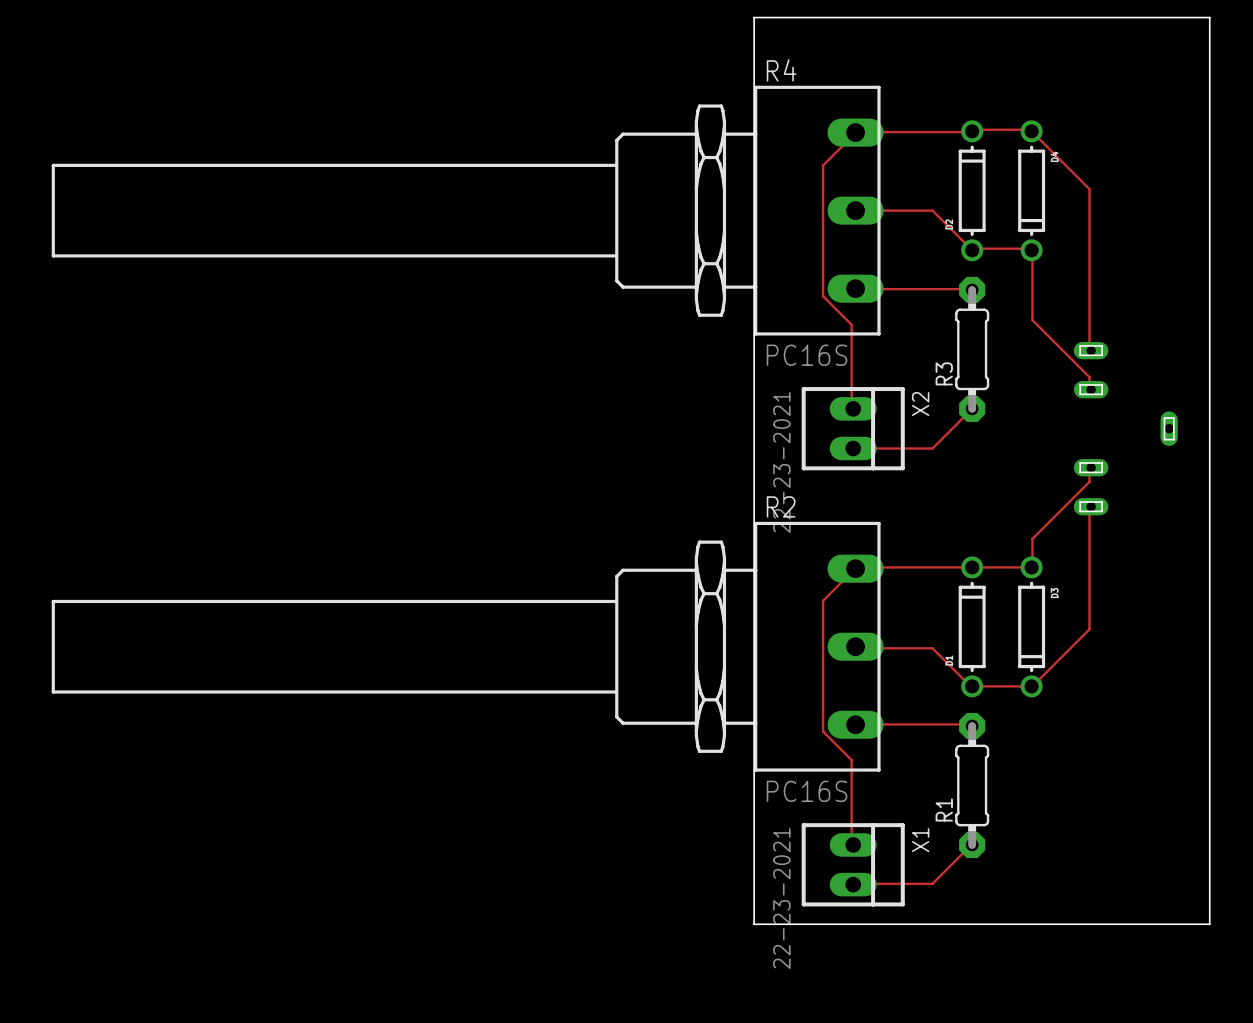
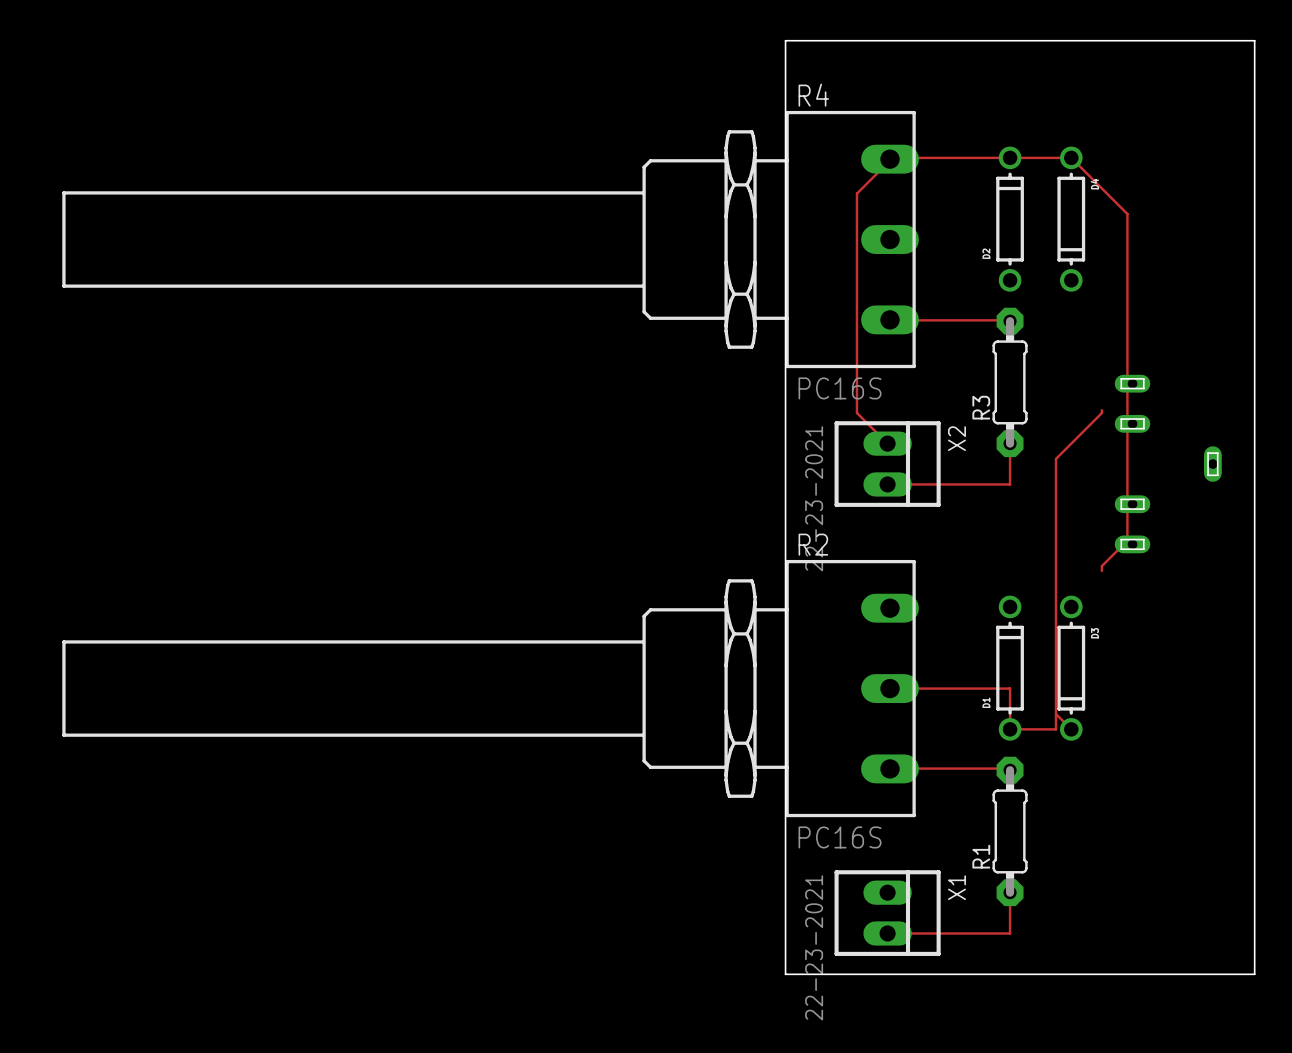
track: (1031, 131) (1030, 129) (972, 129) (970, 132) (856, 132) (823, 165) (823, 296) (851, 324) (851, 408) (853, 408) -> (1071, 157) (892, 157) (856, 193) (856, 413) (887, 443)
track: (1086, 185) (1089, 189) (1089, 348) (1091, 350) -> (1127, 214) (1127, 540) (1101, 566) (1101, 570)
track: (855, 210) (932, 210) (972, 250) (972, 248) (1030, 248) (1032, 251) (1032, 320) (1089, 377) (1091, 389) -> none
track: (972, 408) (932, 448) -> (1010, 443) (1010, 484) (969, 484)
track: (1091, 467) (1089, 481) (1032, 538) (1032, 567) (856, 567) (823, 600) (823, 731) (851, 760) (851, 843) (853, 844) -> none
track: (1091, 506) (1089, 507) (1089, 629) (1032, 686) (1016, 686) -> (1101, 410) (1101, 413) (1055, 458) (1055, 729)
track: (855, 646) (856, 648) (932, 648) (972, 686) -> (890, 688) (1010, 688) (1010, 729)
track: none -> (1055, 714) (1071, 729)
track: (972, 844) (932, 883) (853, 884) -> (1010, 892) (1010, 933) (887, 933)

